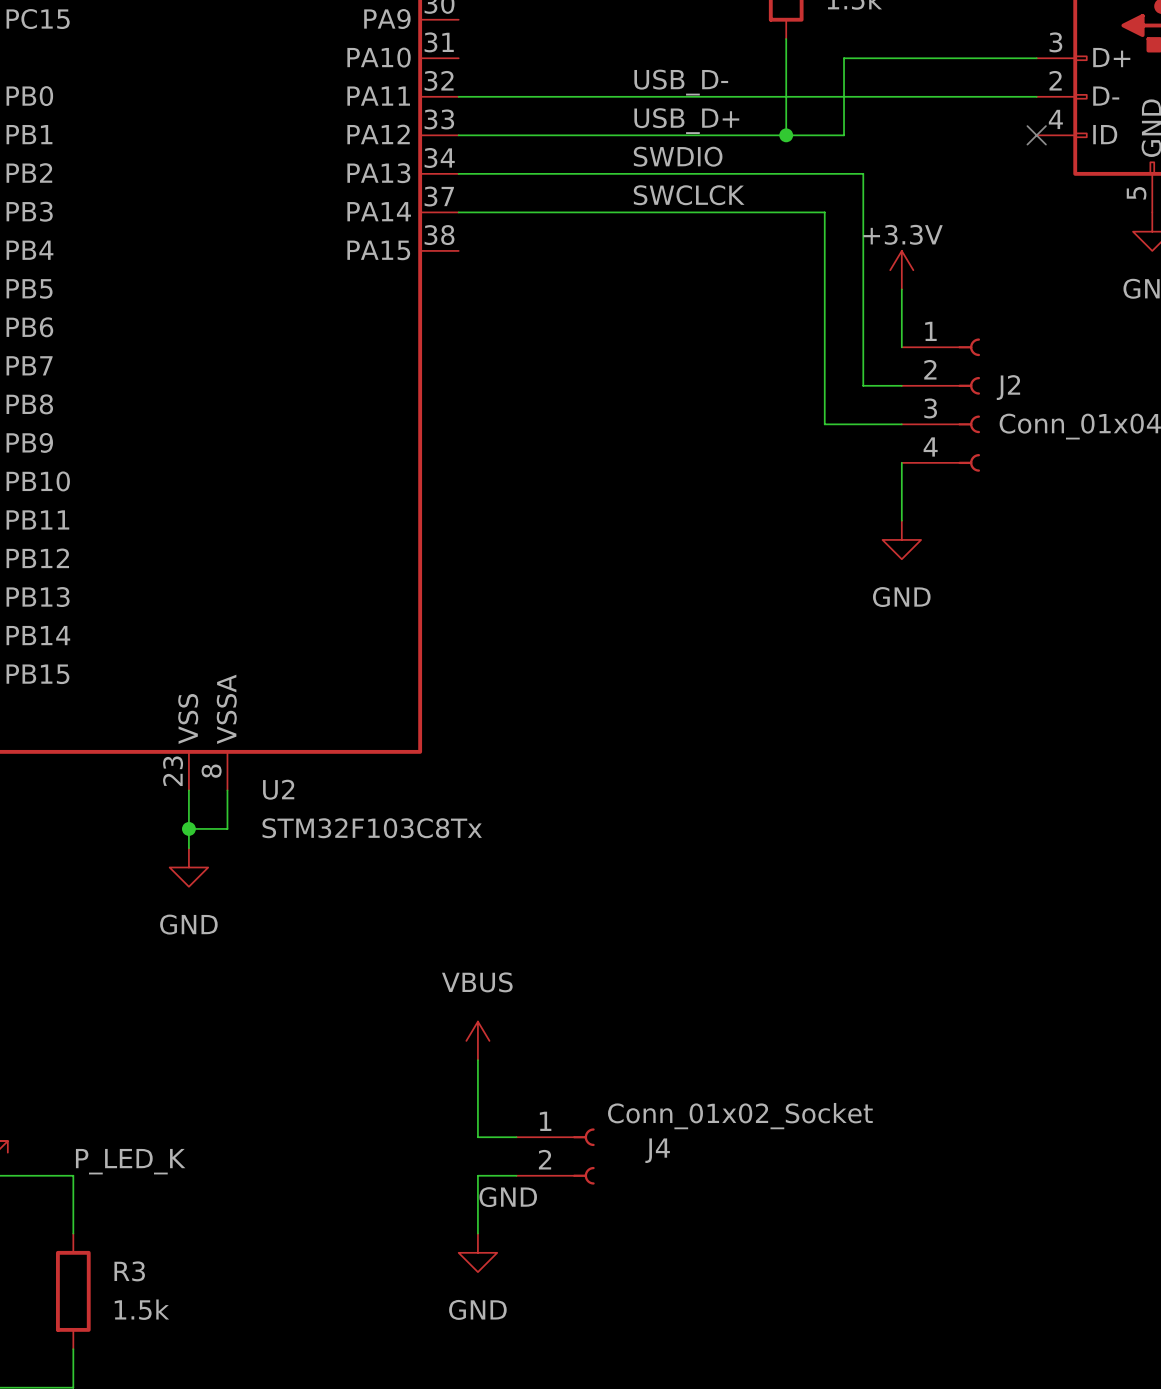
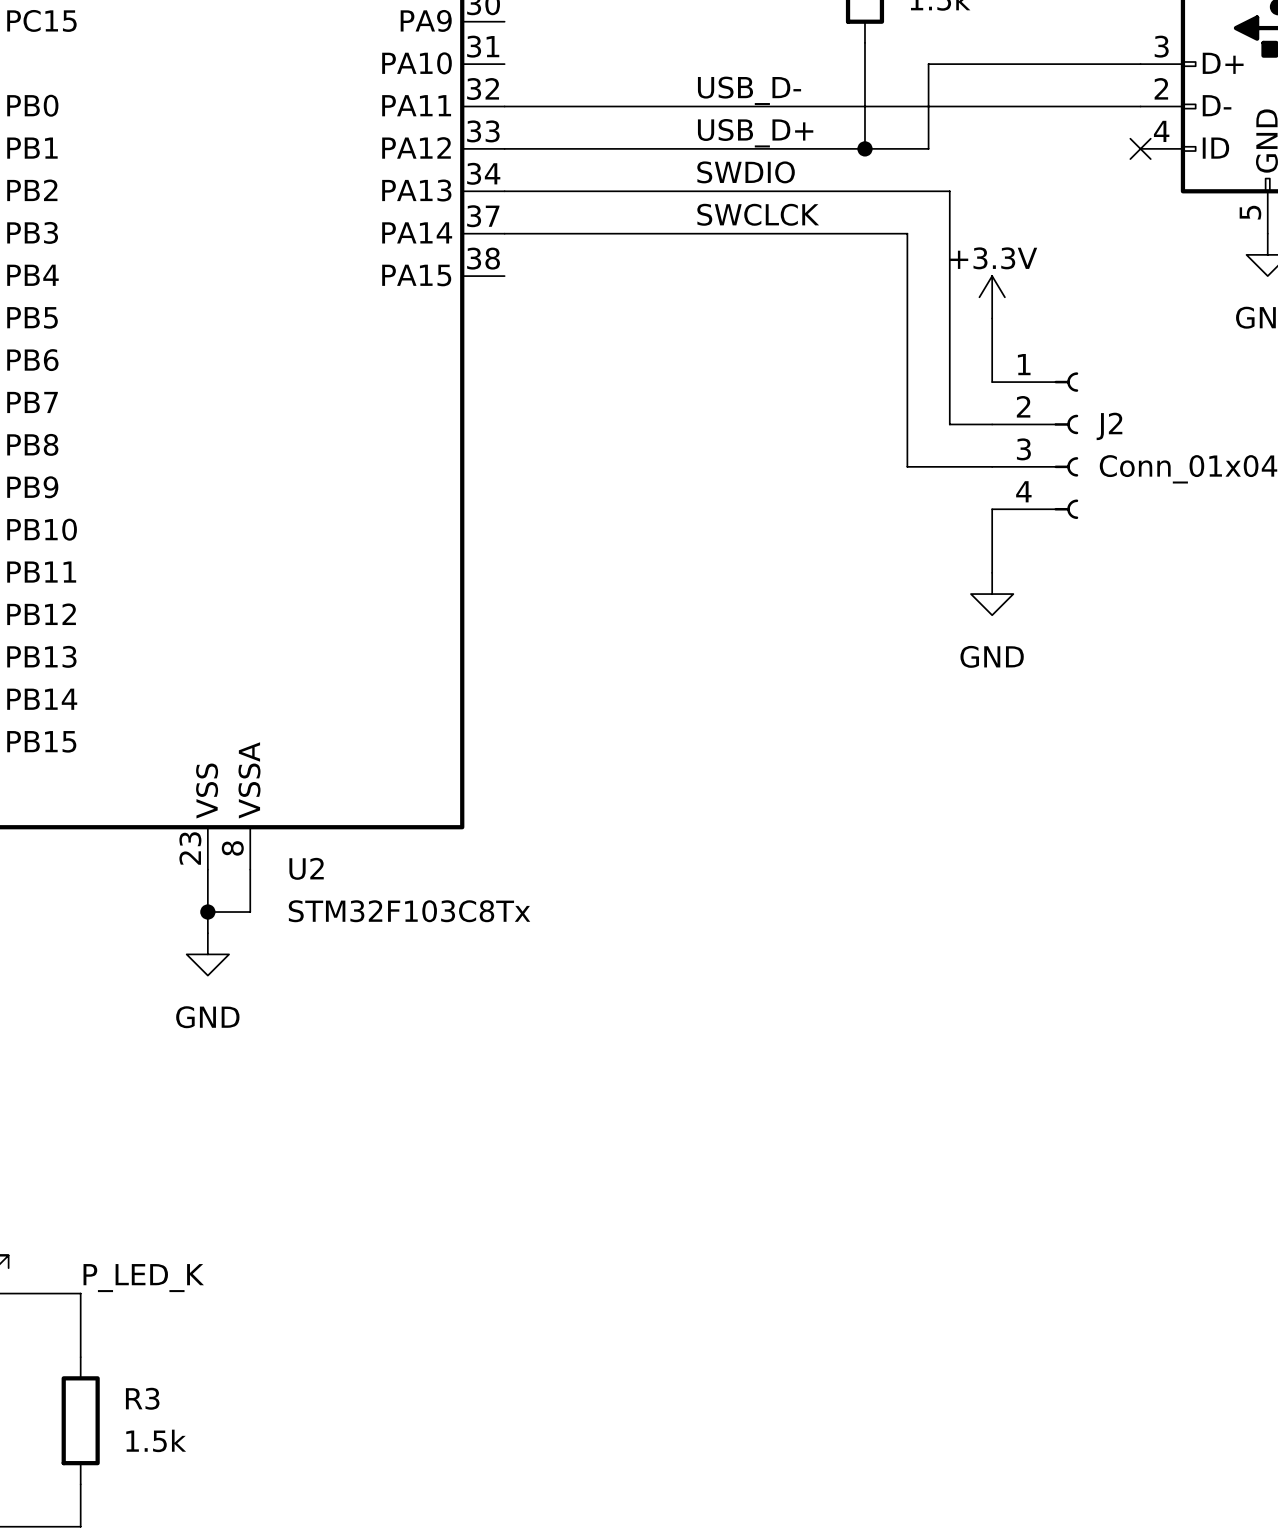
power symbol: VBUS (477, 1040) -> none
wire: (477, 1060) (477, 1137) (516, 1137) -> none
J4: Conn_01x02_Socket (555, 1156) -> none
wire: (516, 1175) (477, 1175) (477, 1233) -> none
label: GND (508, 1197) -> none
power symbol: GND (477, 1252) -> none

